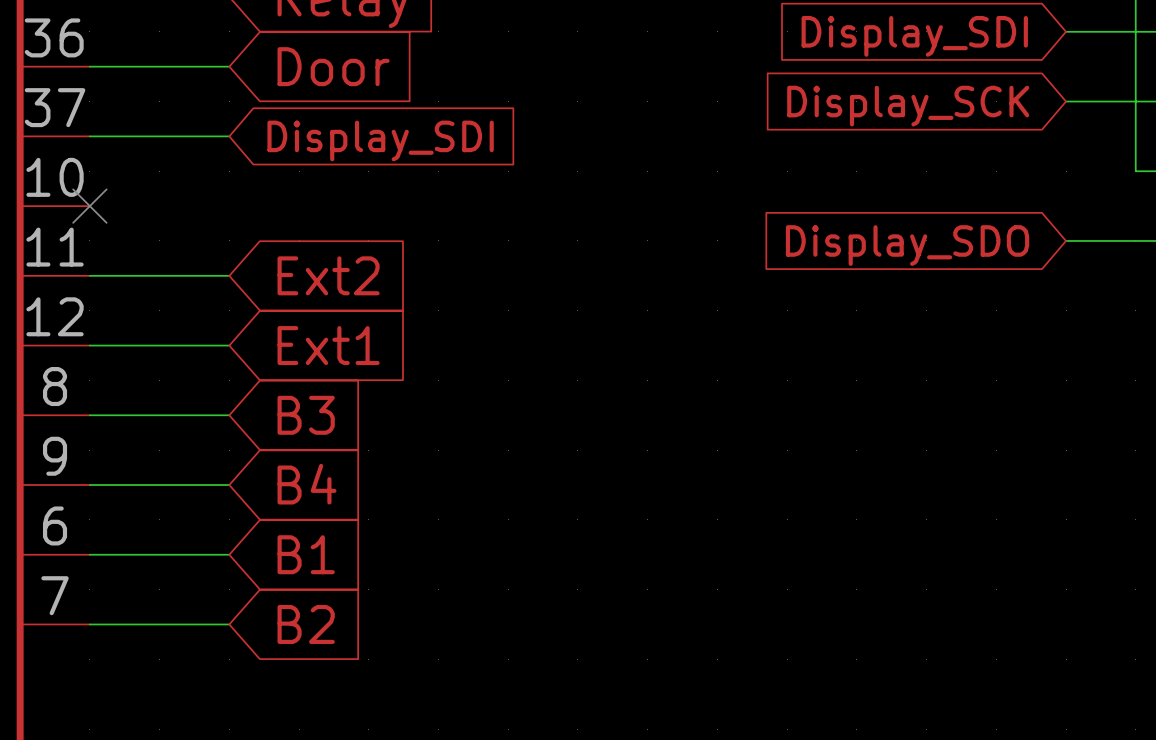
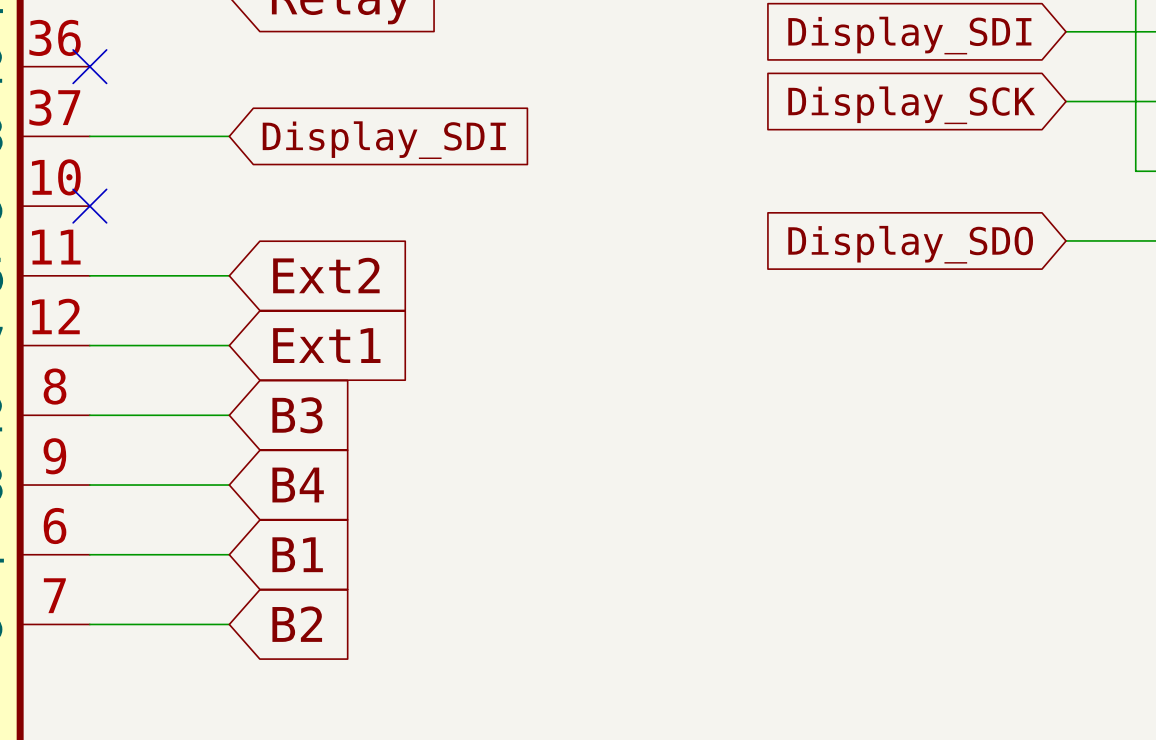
wire: (89, 66) (229, 66) -> none
no-connect mark: none -> (89, 66)
global label: Door (333, 66) -> none

